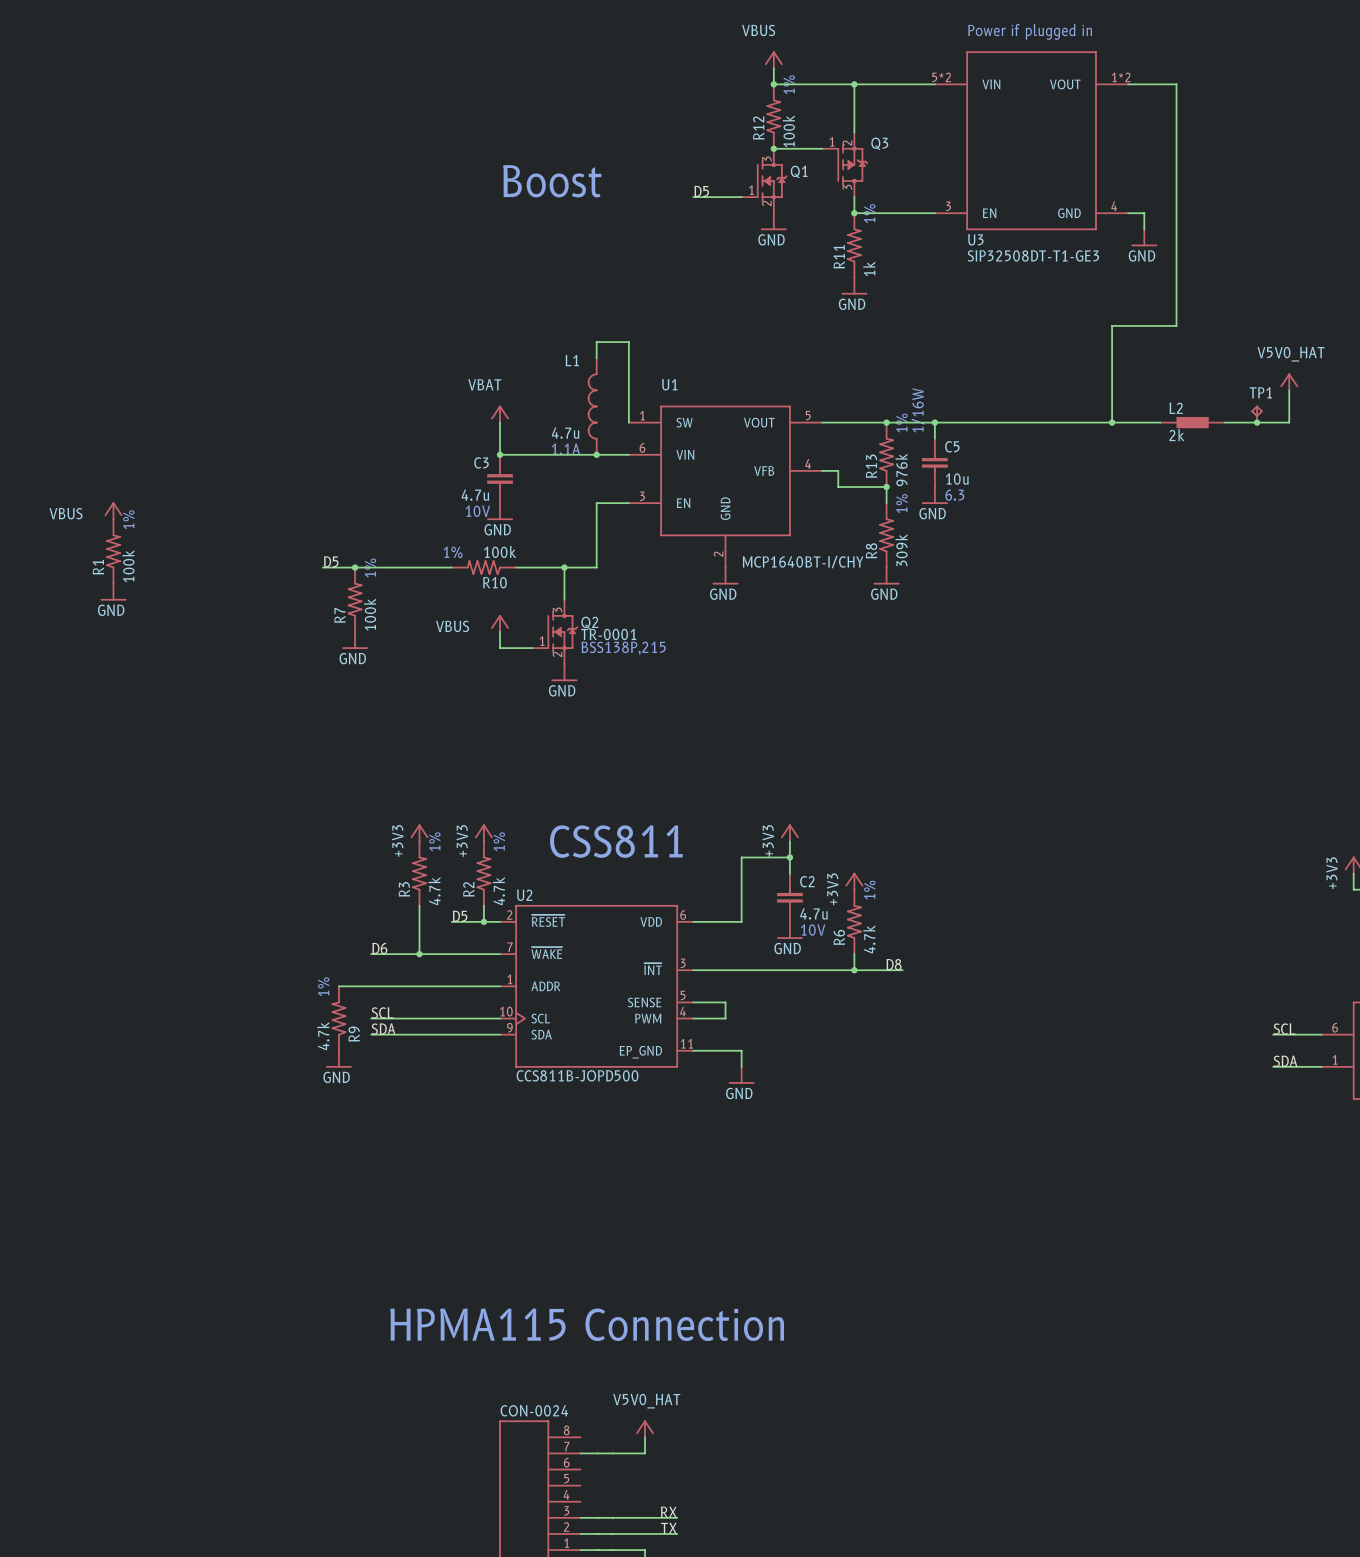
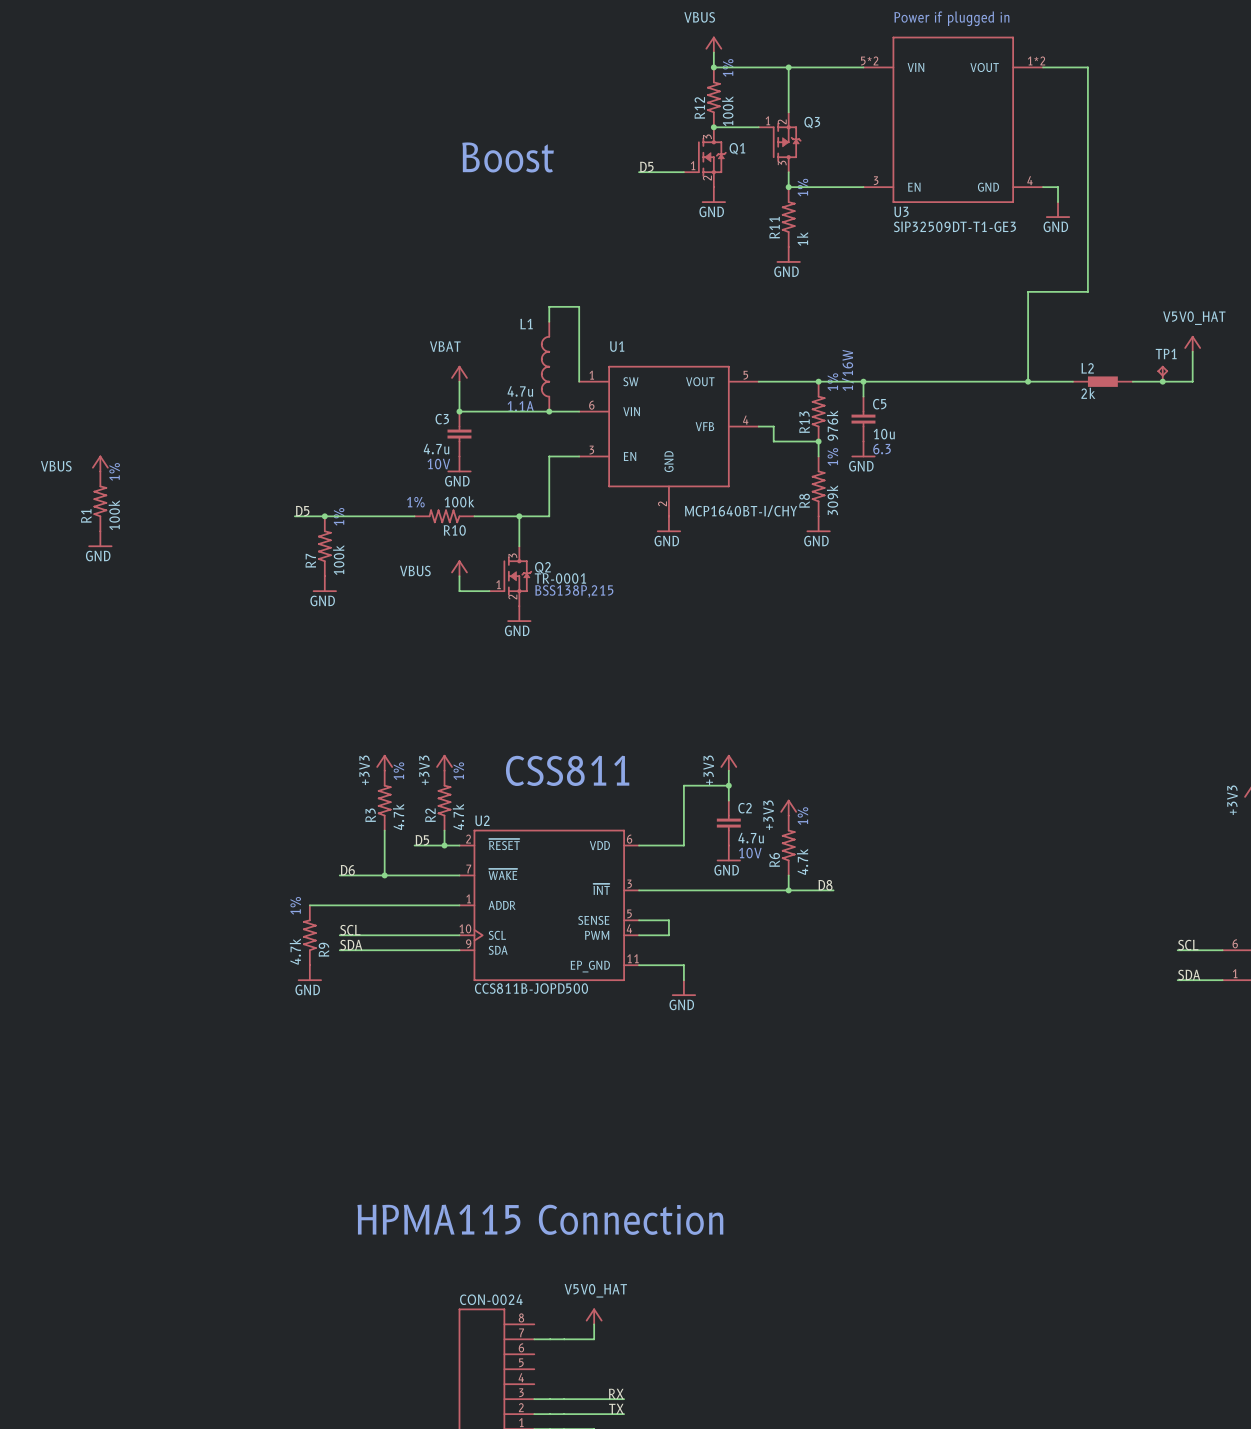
U3 text: SIP32508DT-T1-GE3 (1033, 255) -> SIP32509DT-T1-GE3 (954, 226)

